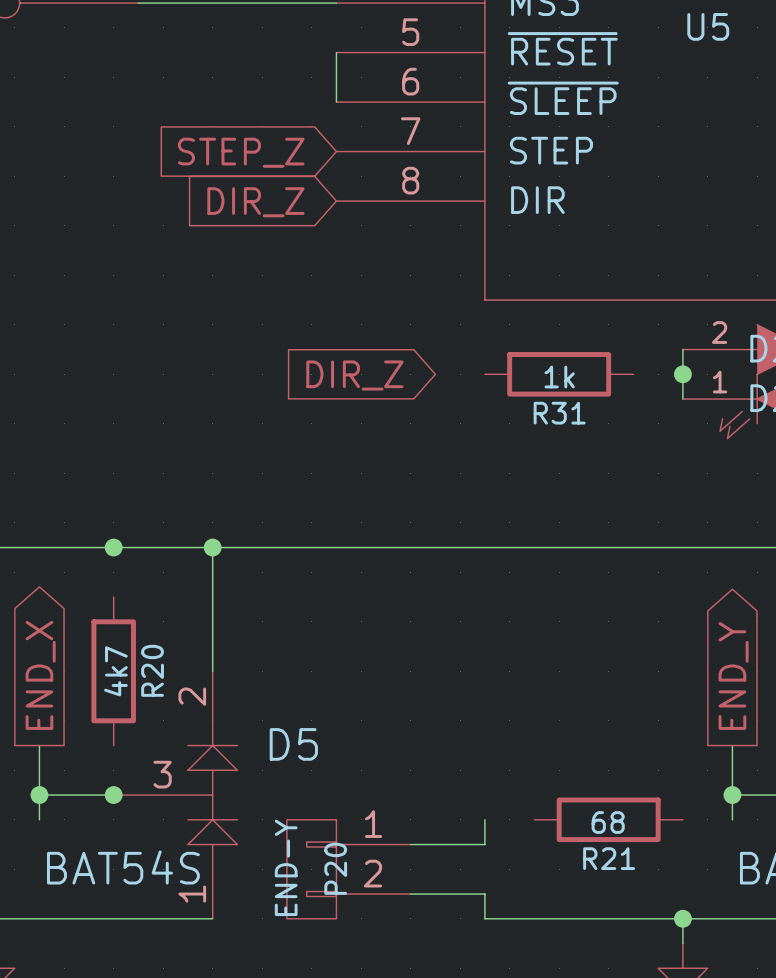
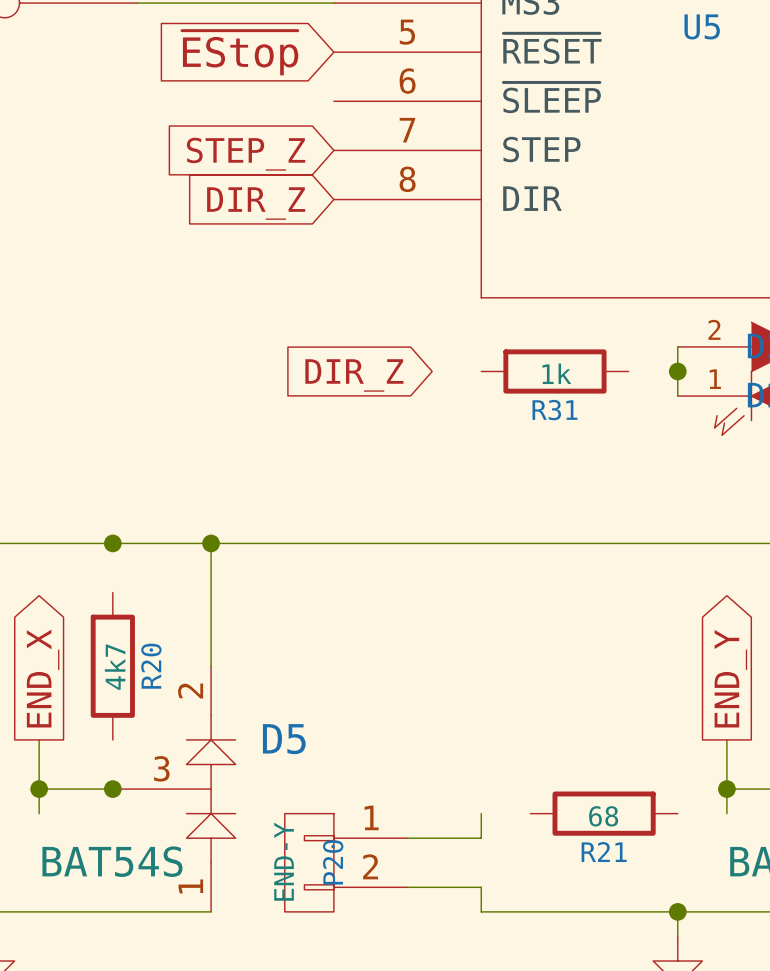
wire: (336, 52) (336, 102) -> none
global label: none -> ~{EStop} (240, 52)

